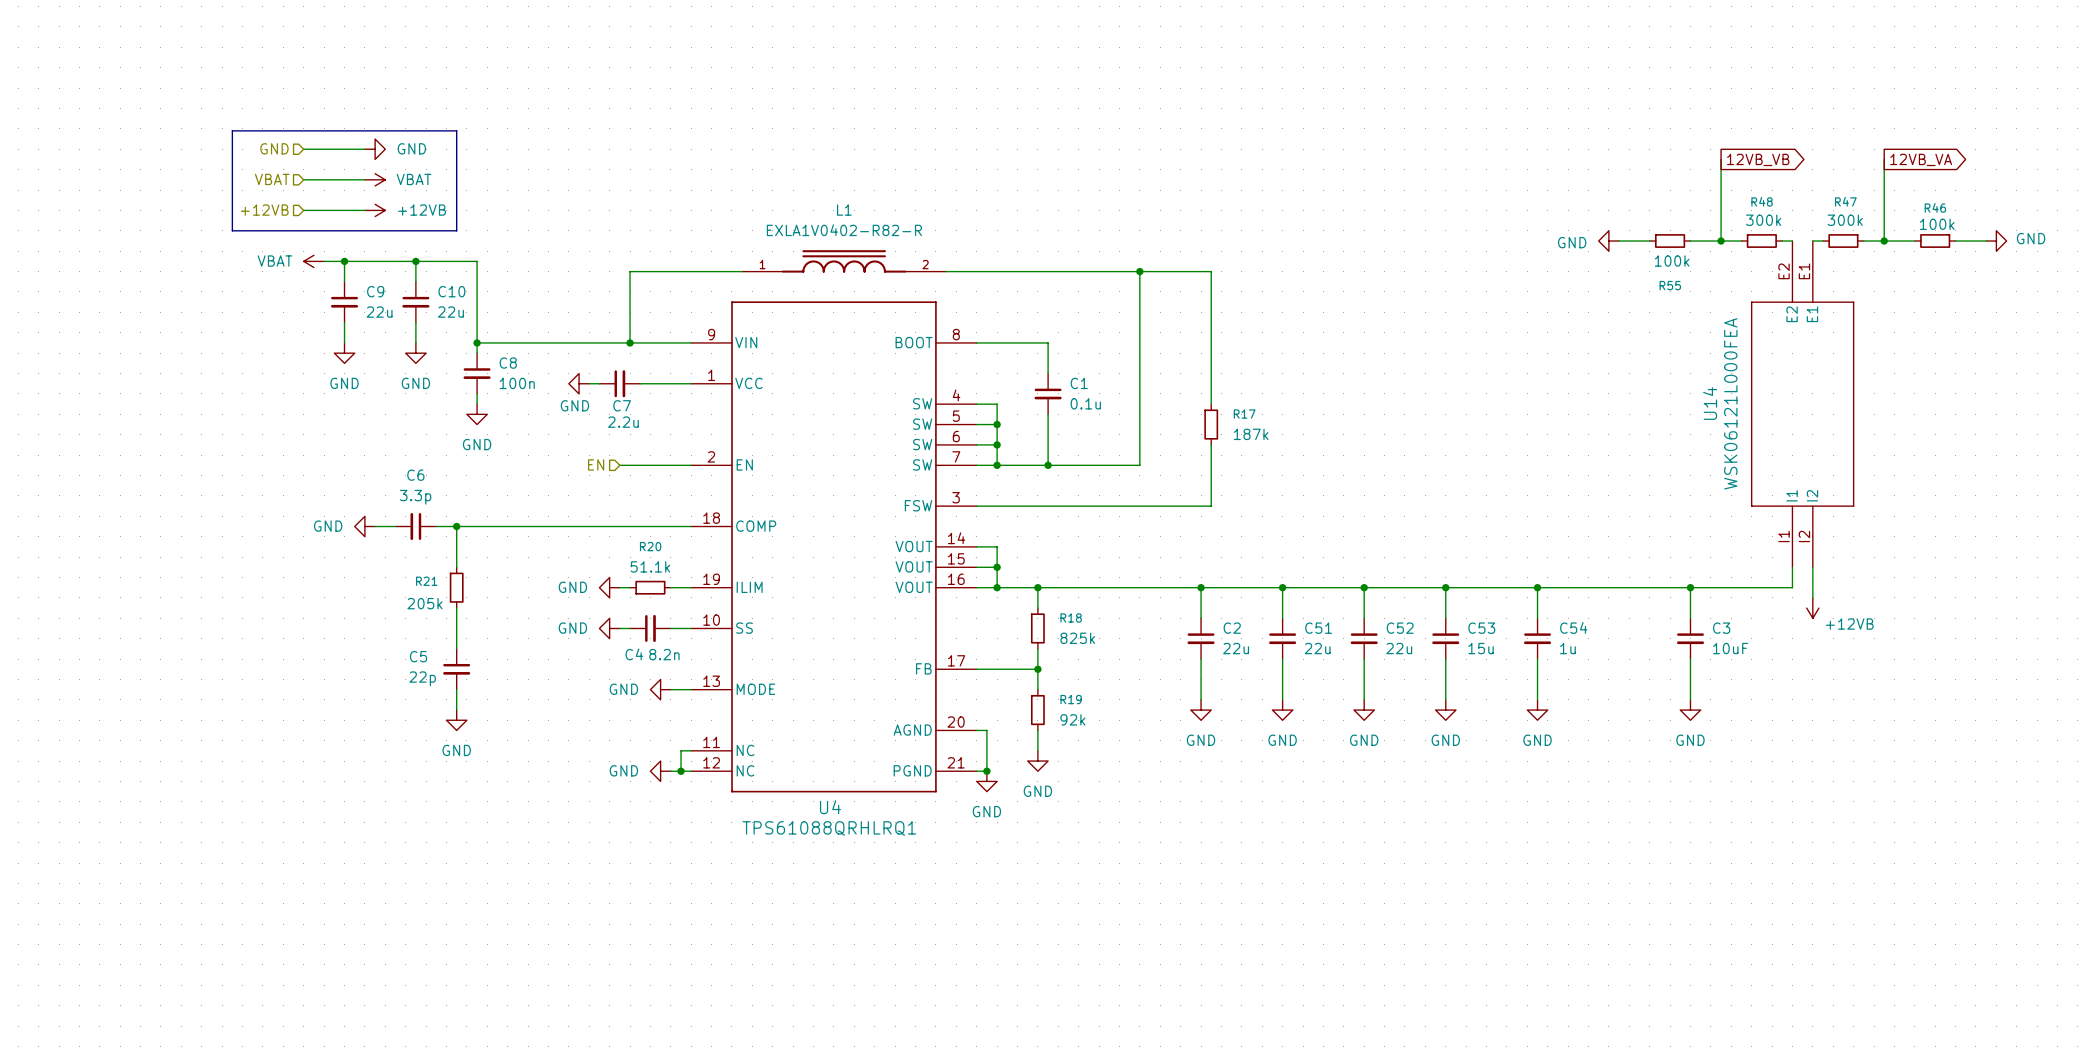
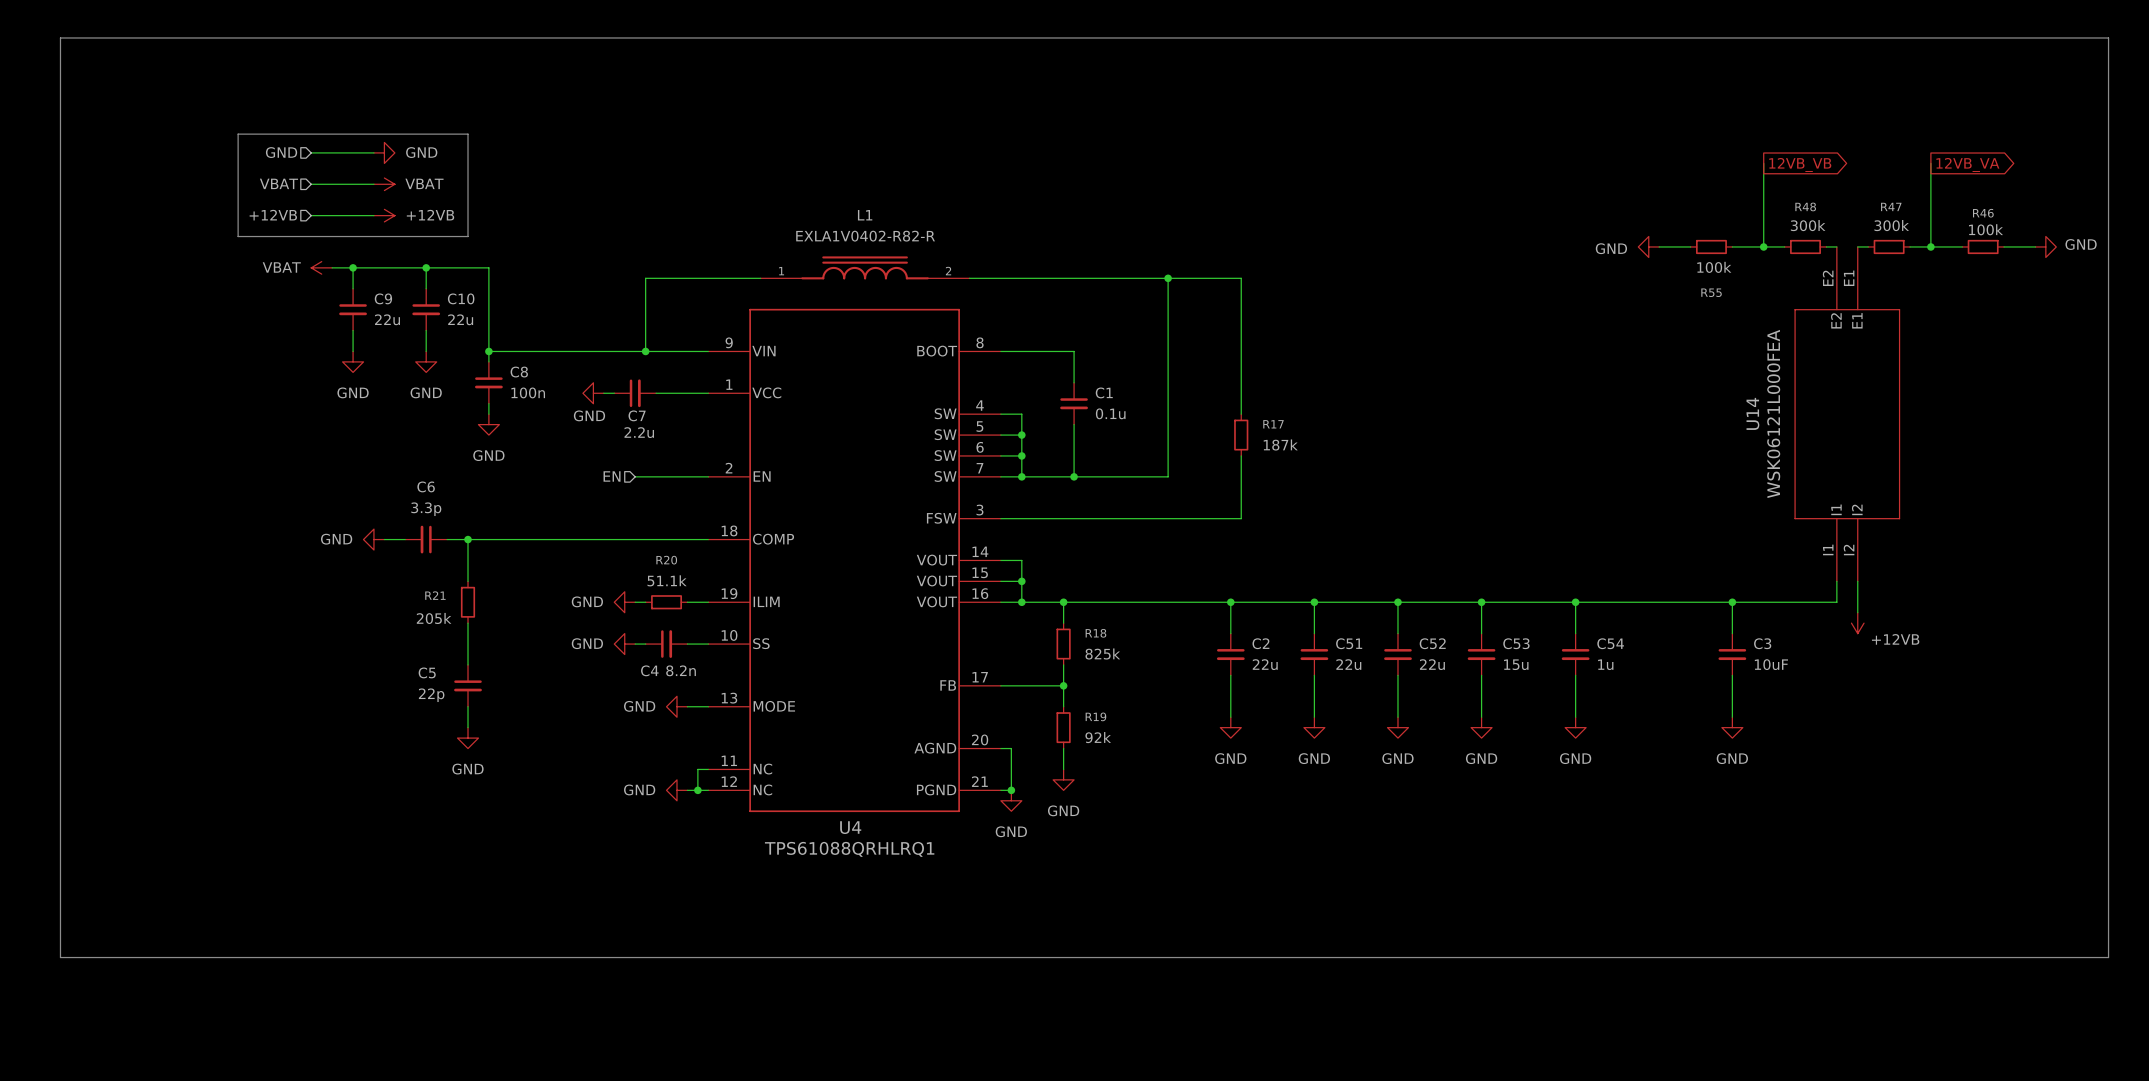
line: none -> (60, 37) (2108, 37) (2108, 957) (60, 957) (60, 37)

